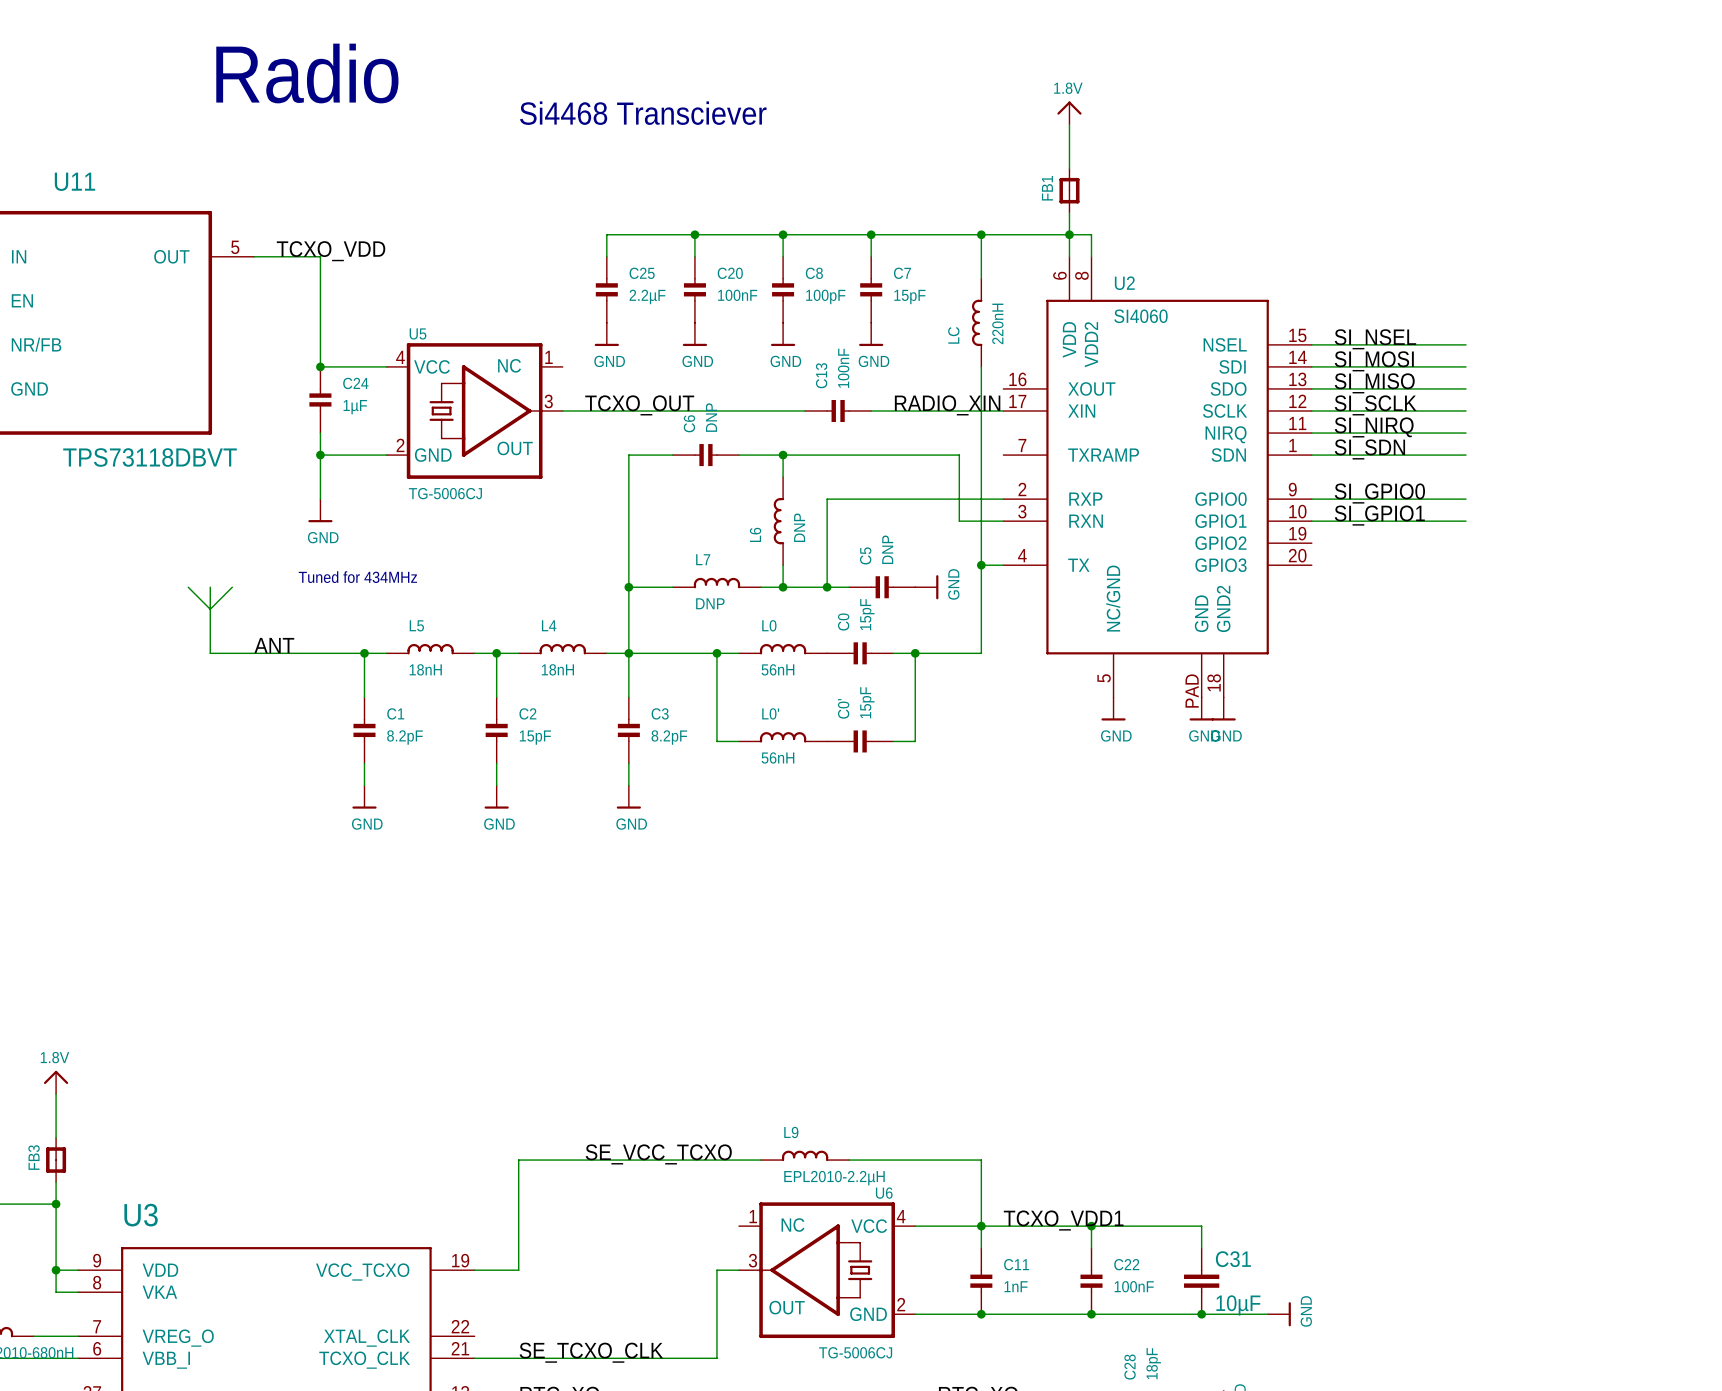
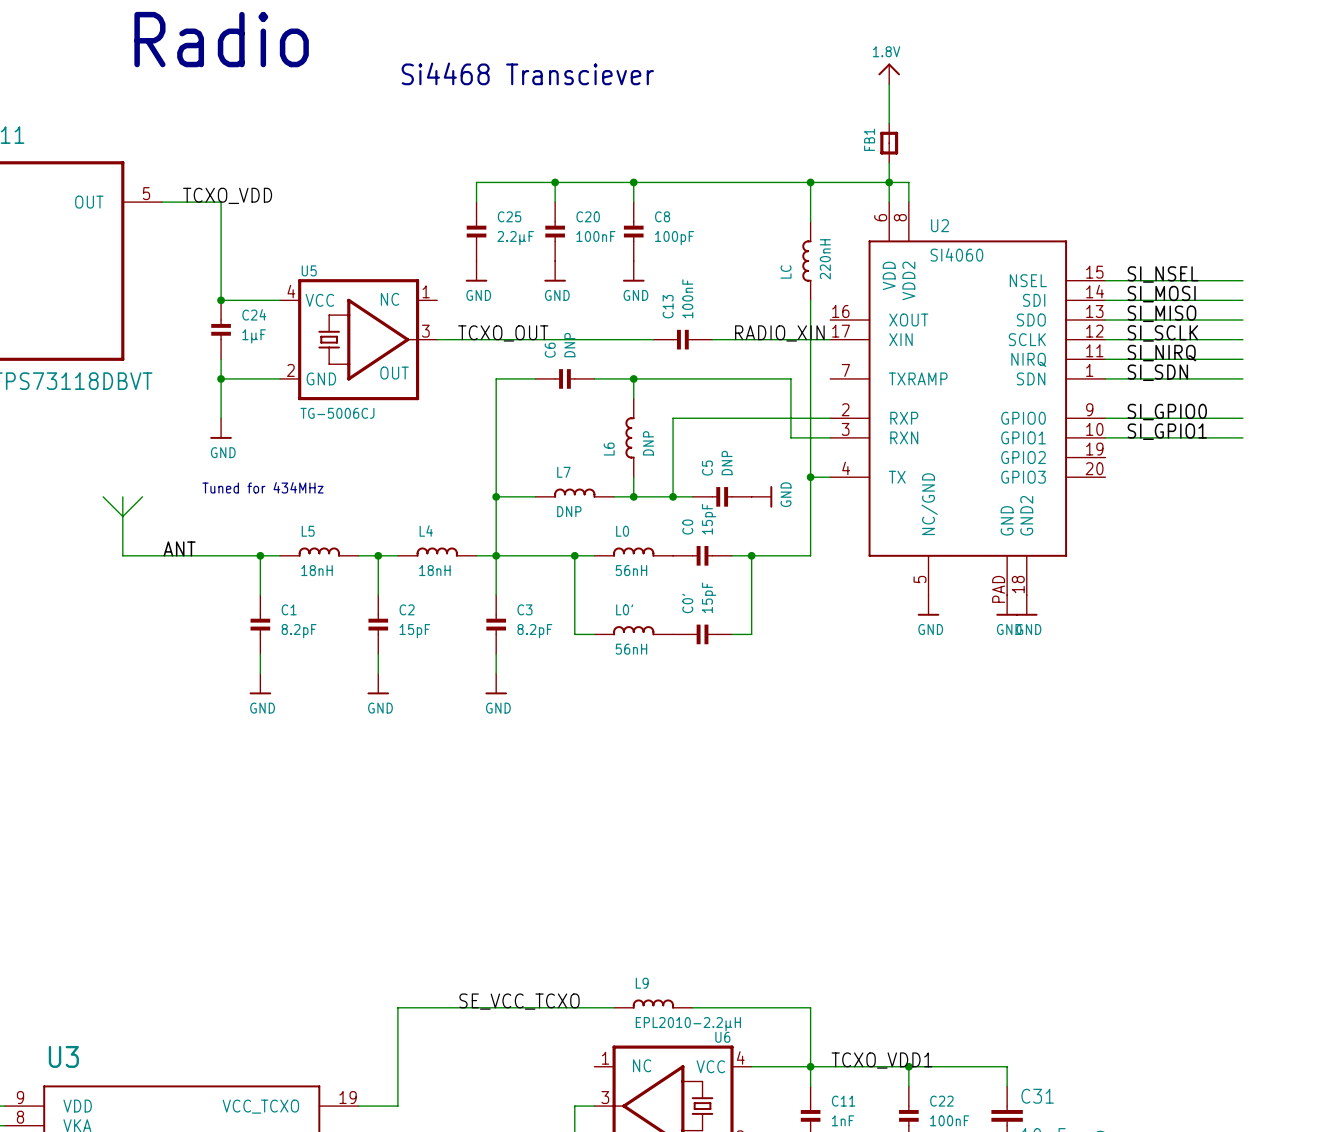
wire: (871, 234) (871, 256) -> none
junction: (871, 234) -> none
C7: 15pF (871, 289) -> none
power symbol: GND (871, 334) -> none

